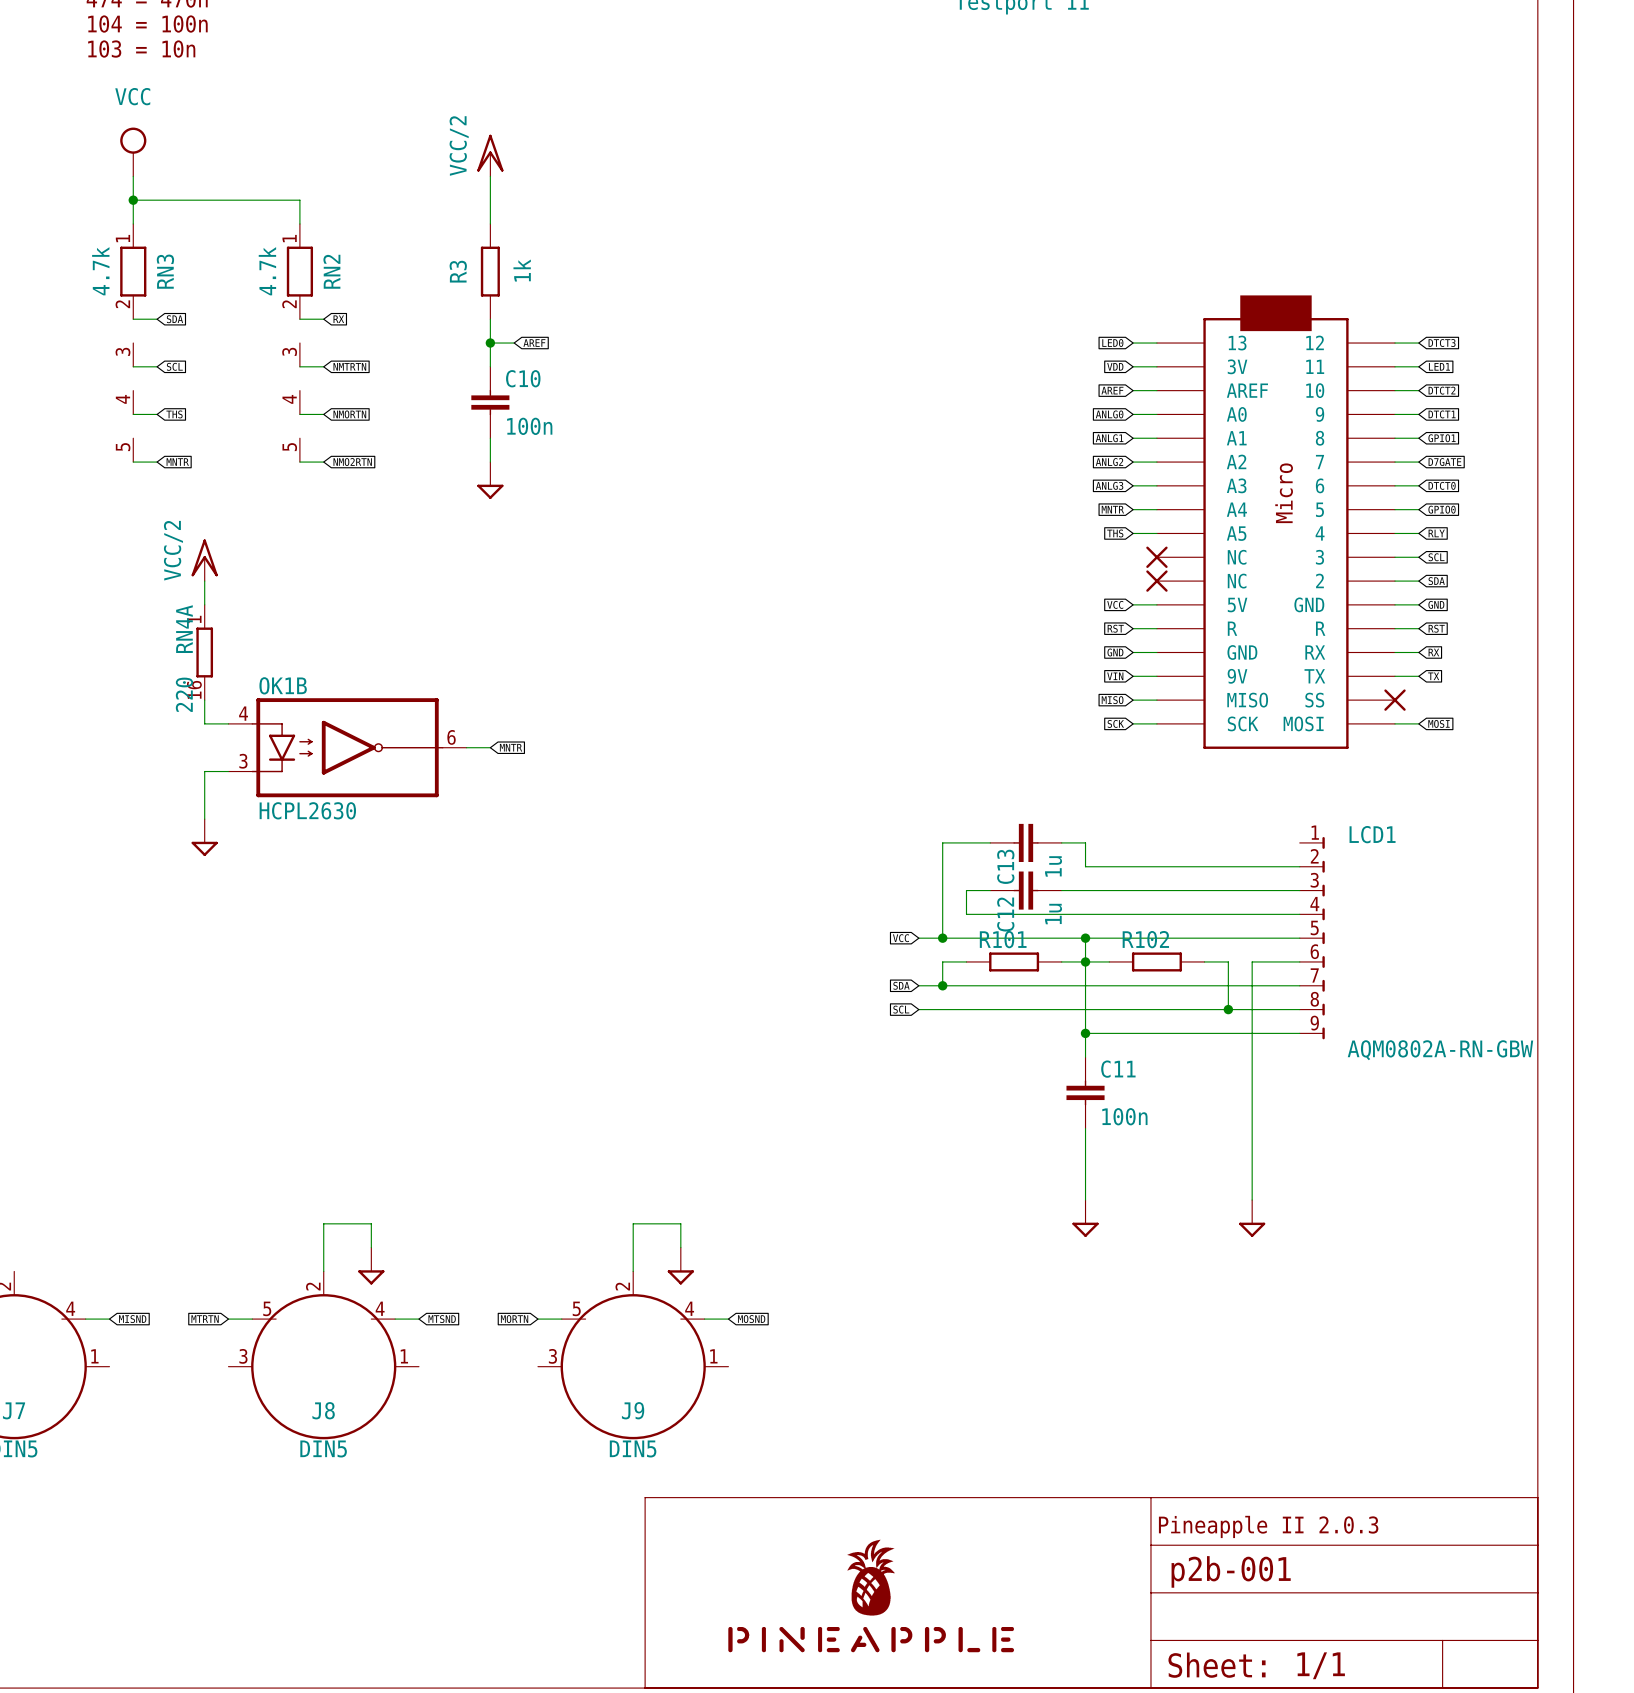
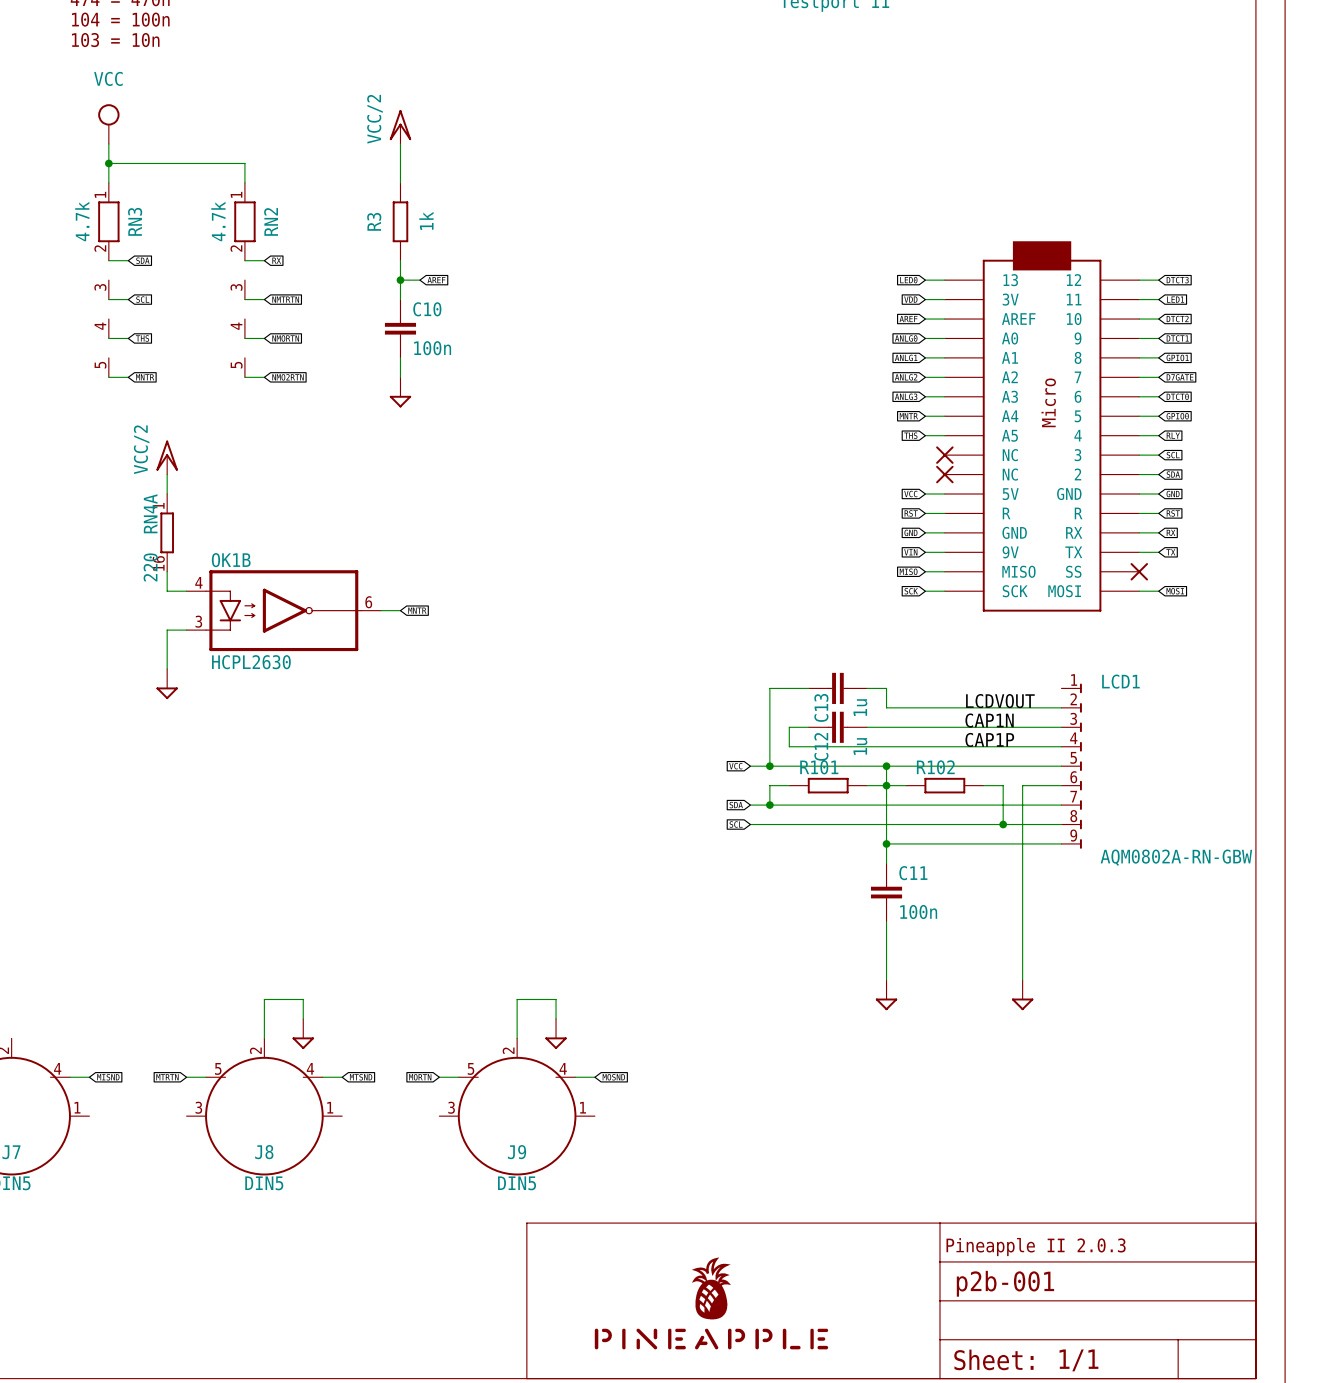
label: none -> LCDVOUT (1000, 701)
label: none -> CAP1N (989, 720)
label: none -> CAP1P (989, 739)

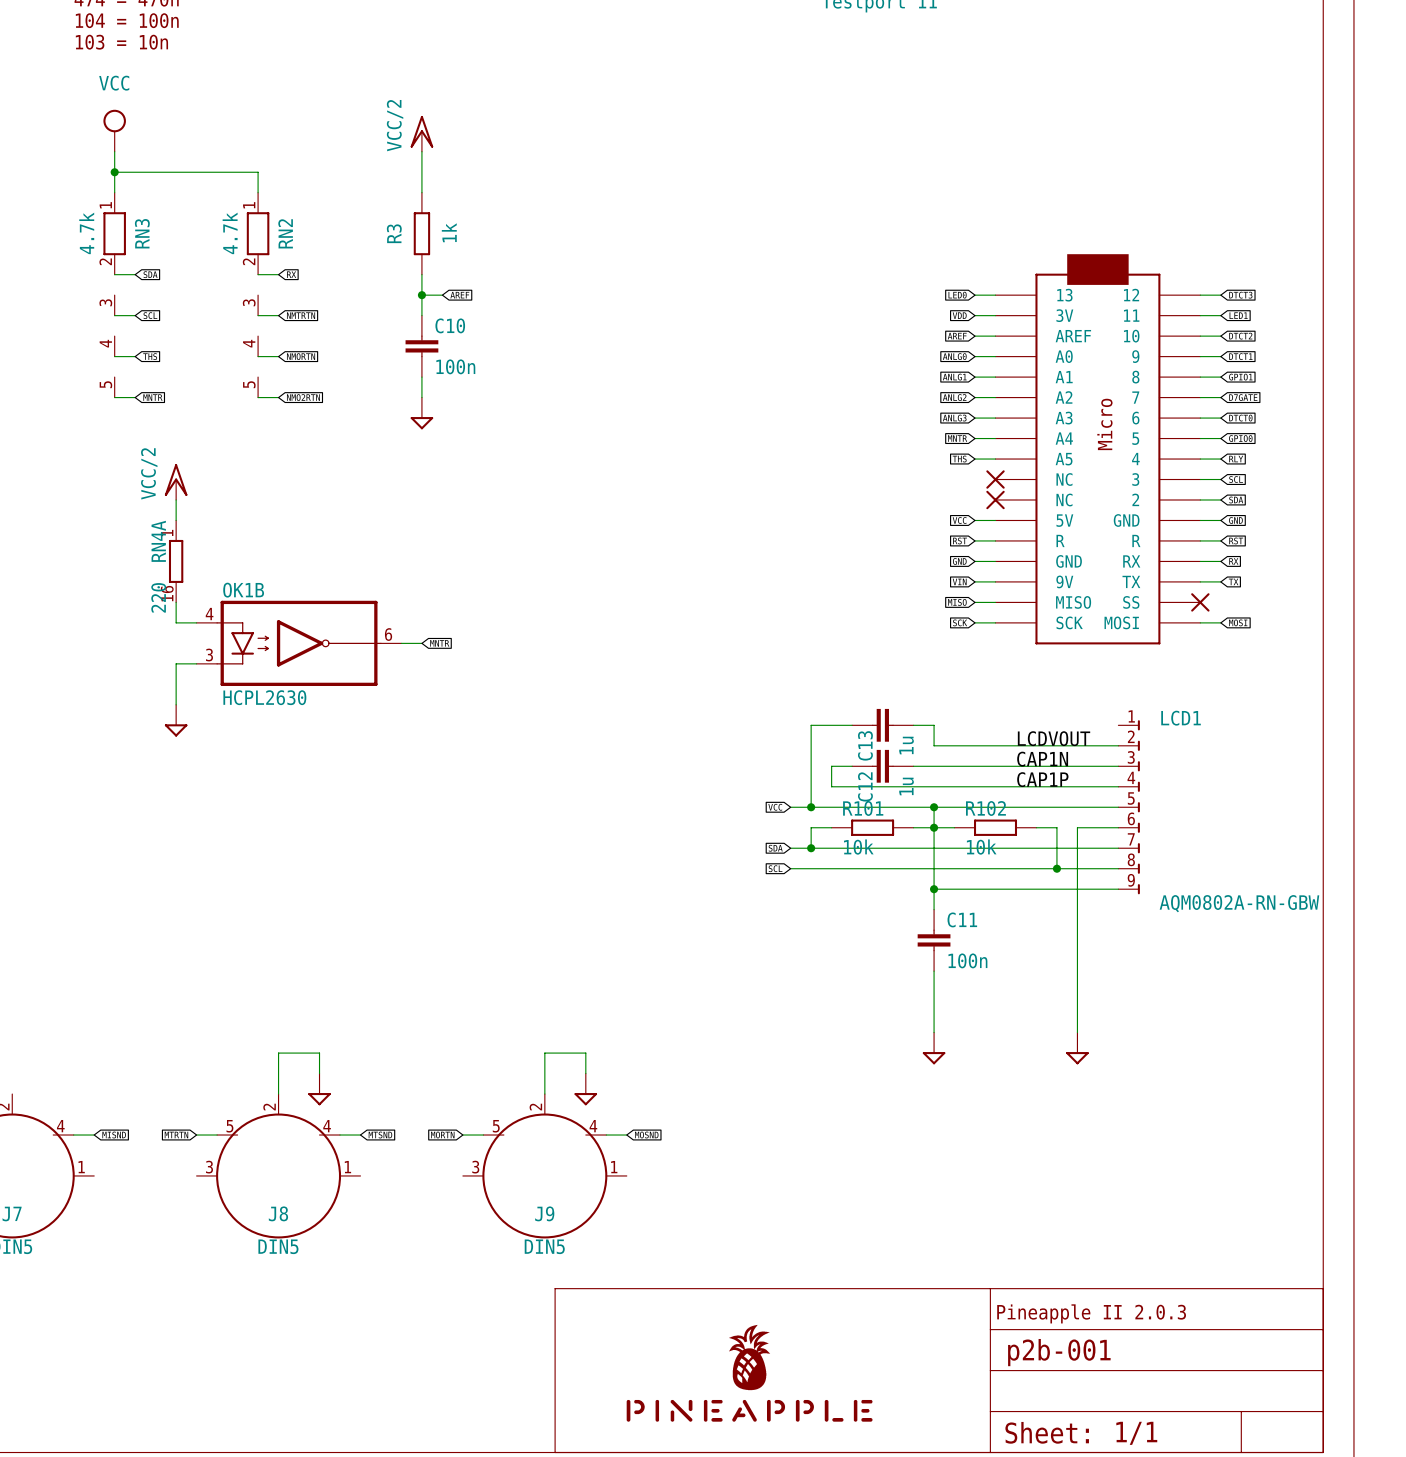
R101 value: none -> 10k (858, 847)
R102 value: none -> 10k (981, 847)

